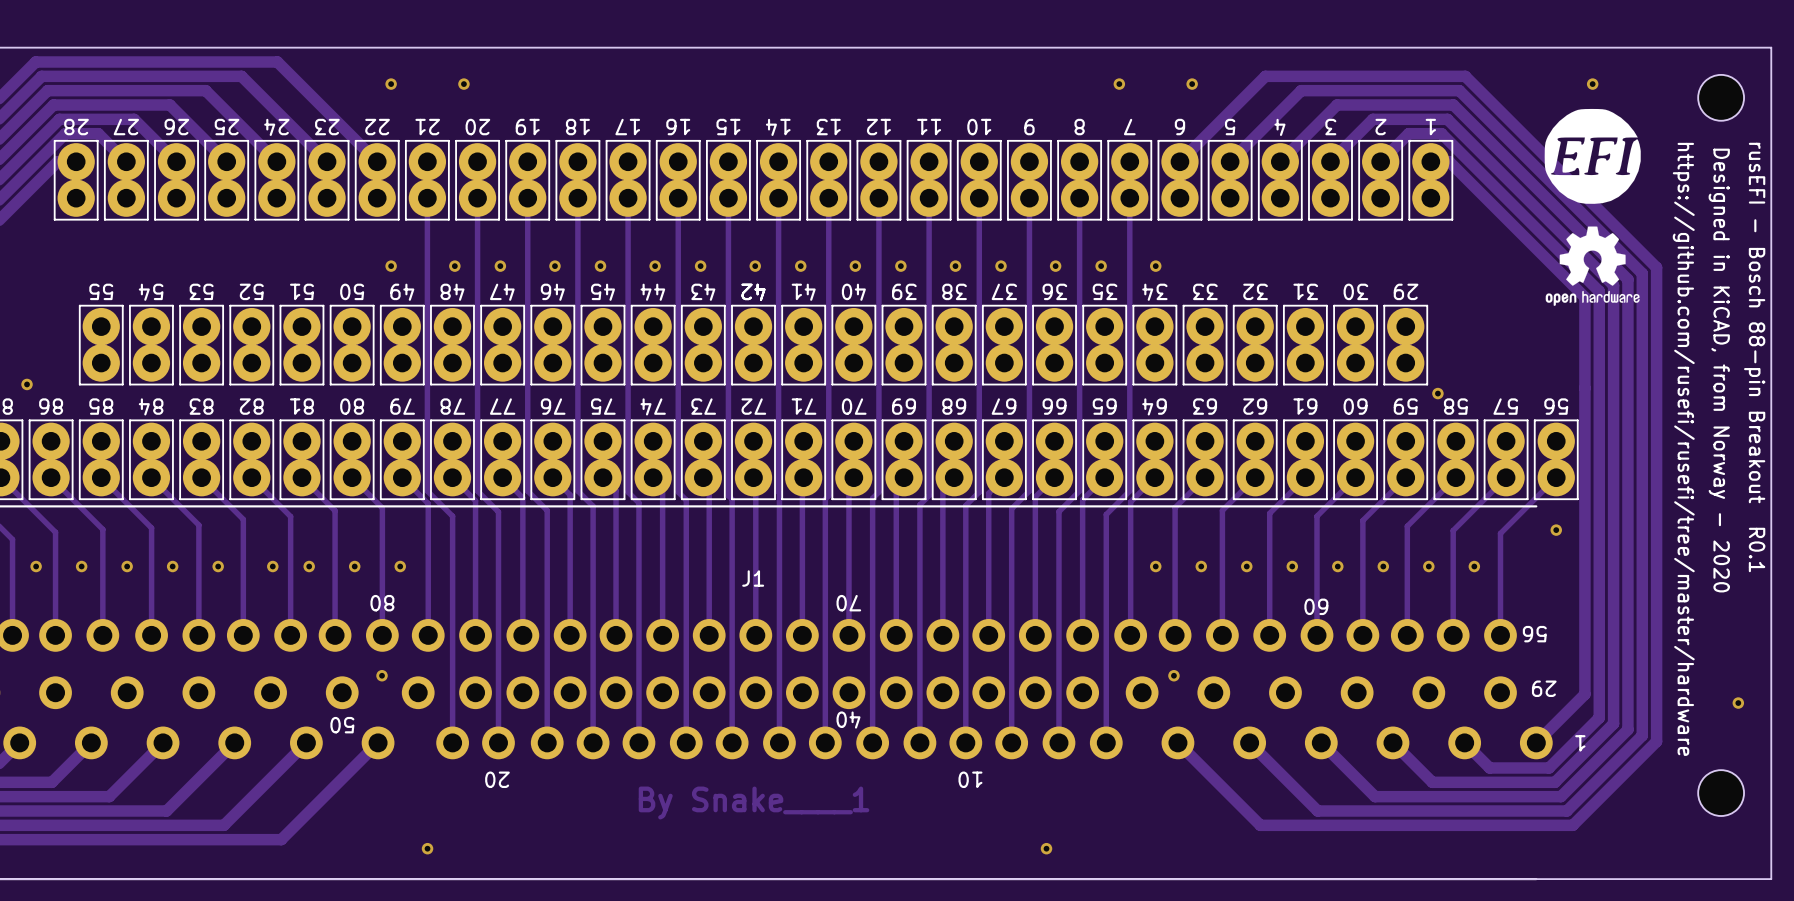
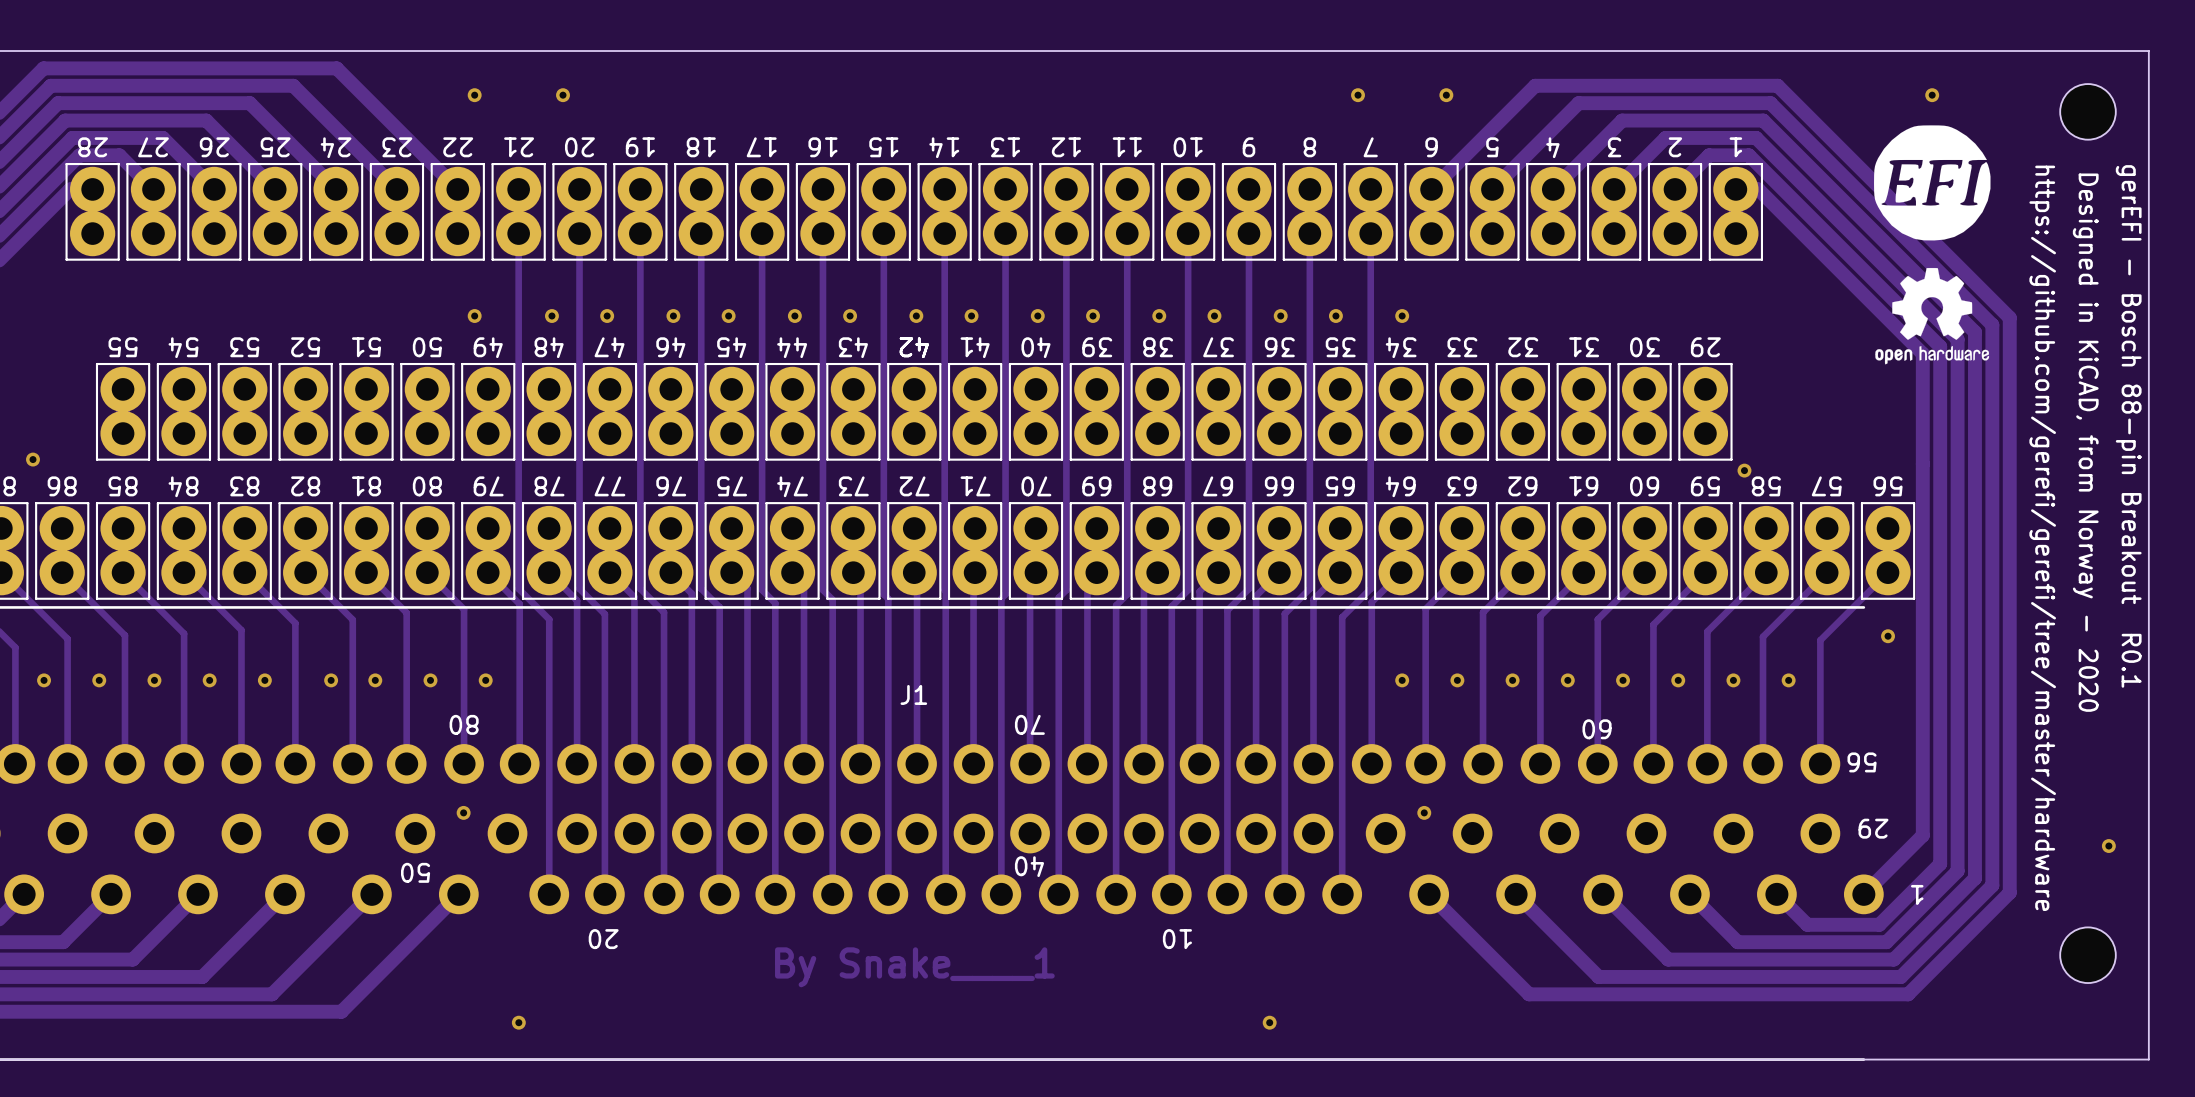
text: rusEFI - Bosch 88-pin Breakout R0.1 (1754, 357) -> gerEFI - Bosch 88-pin Breakout R0.1 (2128, 426)
text: https://github.com/rusefi/rusefi/tree/master/hardware (1683, 449) -> https://github.com/gerefi/gerefi/tree/master/hardware (2042, 538)

